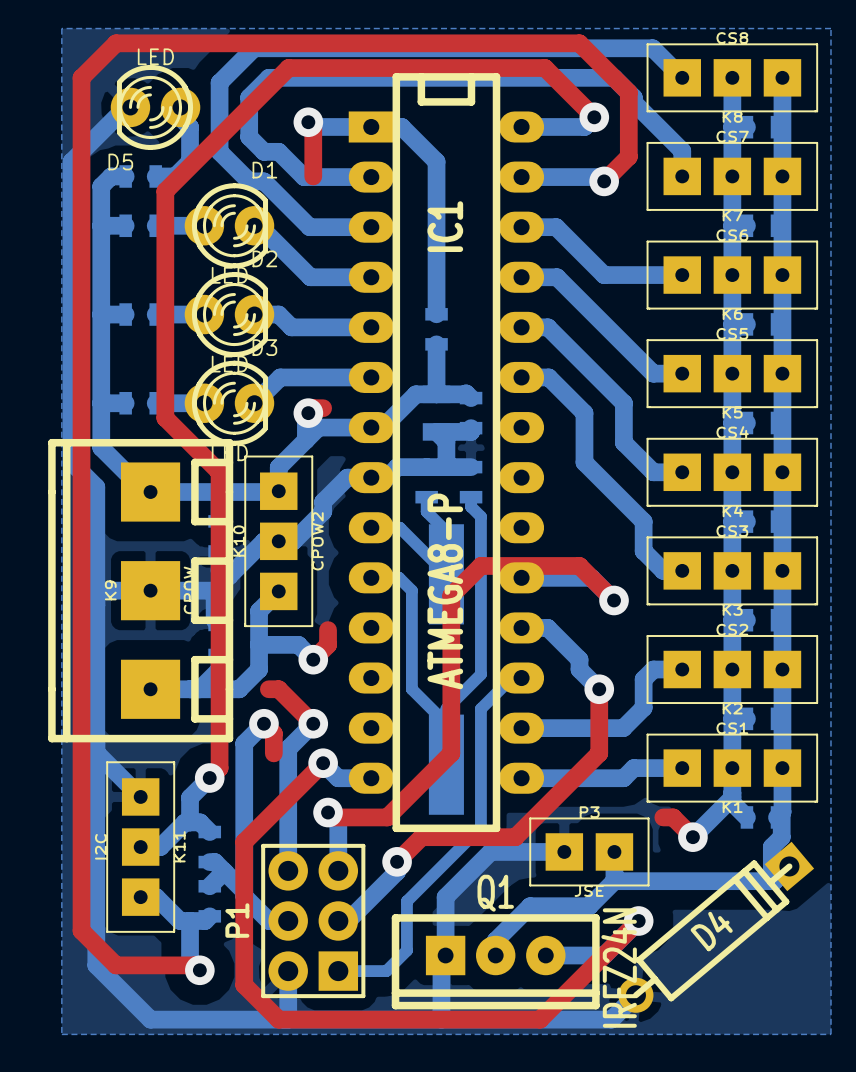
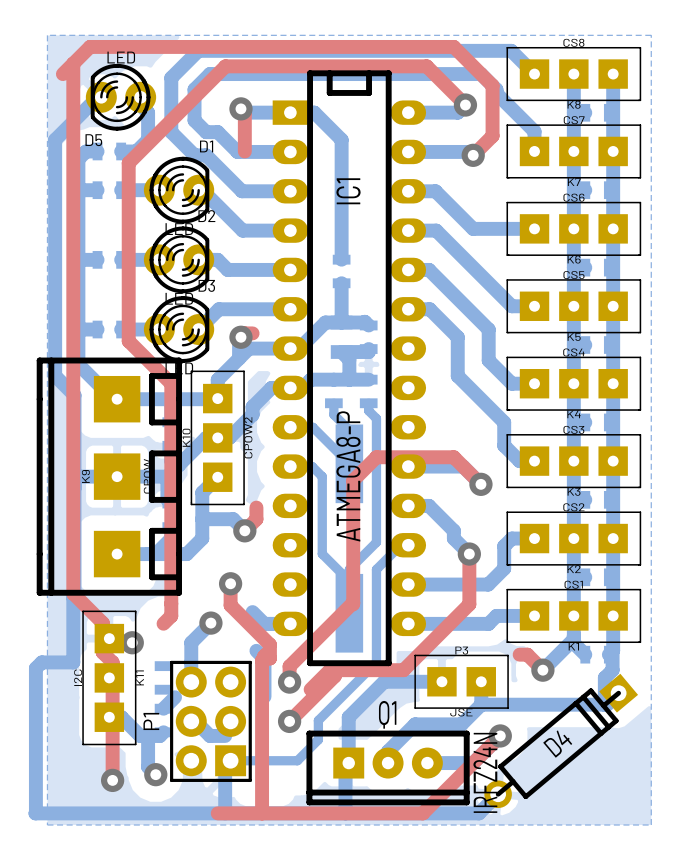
top track: none -> (73, 63) (73, 593) (102, 623) (102, 652) (112, 662) (112, 780)
top track: (81, 77) (81, 930) (116, 965) (194, 965) (199, 970) -> none
top track: (268, 689) (278, 689) (313, 723) -> none
bottom track: (263, 723) (244, 743) (244, 891) (214, 862) (209, 862) -> none
top track: (263, 723) (273, 733) (273, 753) -> none
via: (263, 723) -> none
bottom track: (313, 723) (288, 748) (288, 870) -> none
via position: (313, 723) -> (230, 583)
top track: none -> (230, 583) (230, 605) (269, 644) (269, 658) (265, 654) (262, 660) (262, 813)
top track: none -> (353, 602) (289, 666) (289, 682)
top track: (451, 753) (387, 817) (332, 817) (328, 812) -> none
top track: (323, 763) (244, 842) (244, 985) (278, 1019) -> none
via: (323, 763) -> none
bottom track: none -> (210, 623) (191, 642) (191, 682)
via: none -> (210, 623)
bottom track: (209, 778) (190, 797) (190, 822) -> none
via: (209, 778) -> none
bottom track: (140, 796) (96, 752) (96, 965) (150, 1019) -> (74, 596) (73, 662) (41, 662) (35, 668) (35, 813) (117, 813)
via: none -> (132, 642)
via: (328, 812) -> none
bottom track: (209, 832) (200, 822) (185, 822) (160, 847) (140, 847) -> none
top track: none -> (334, 670) (334, 676) (289, 721)
via: none -> (289, 682)
bottom track: (397, 861) (397, 871) (347, 920) (338, 920) -> none
via: (397, 861) -> none
via: none -> (289, 721)
P1 position: (313, 920) -> (210, 721)
bottom track: (406, 925) (406, 950) (386, 971) (338, 971) -> (318, 739) (297, 760) (230, 760)
via: none -> (112, 780)

